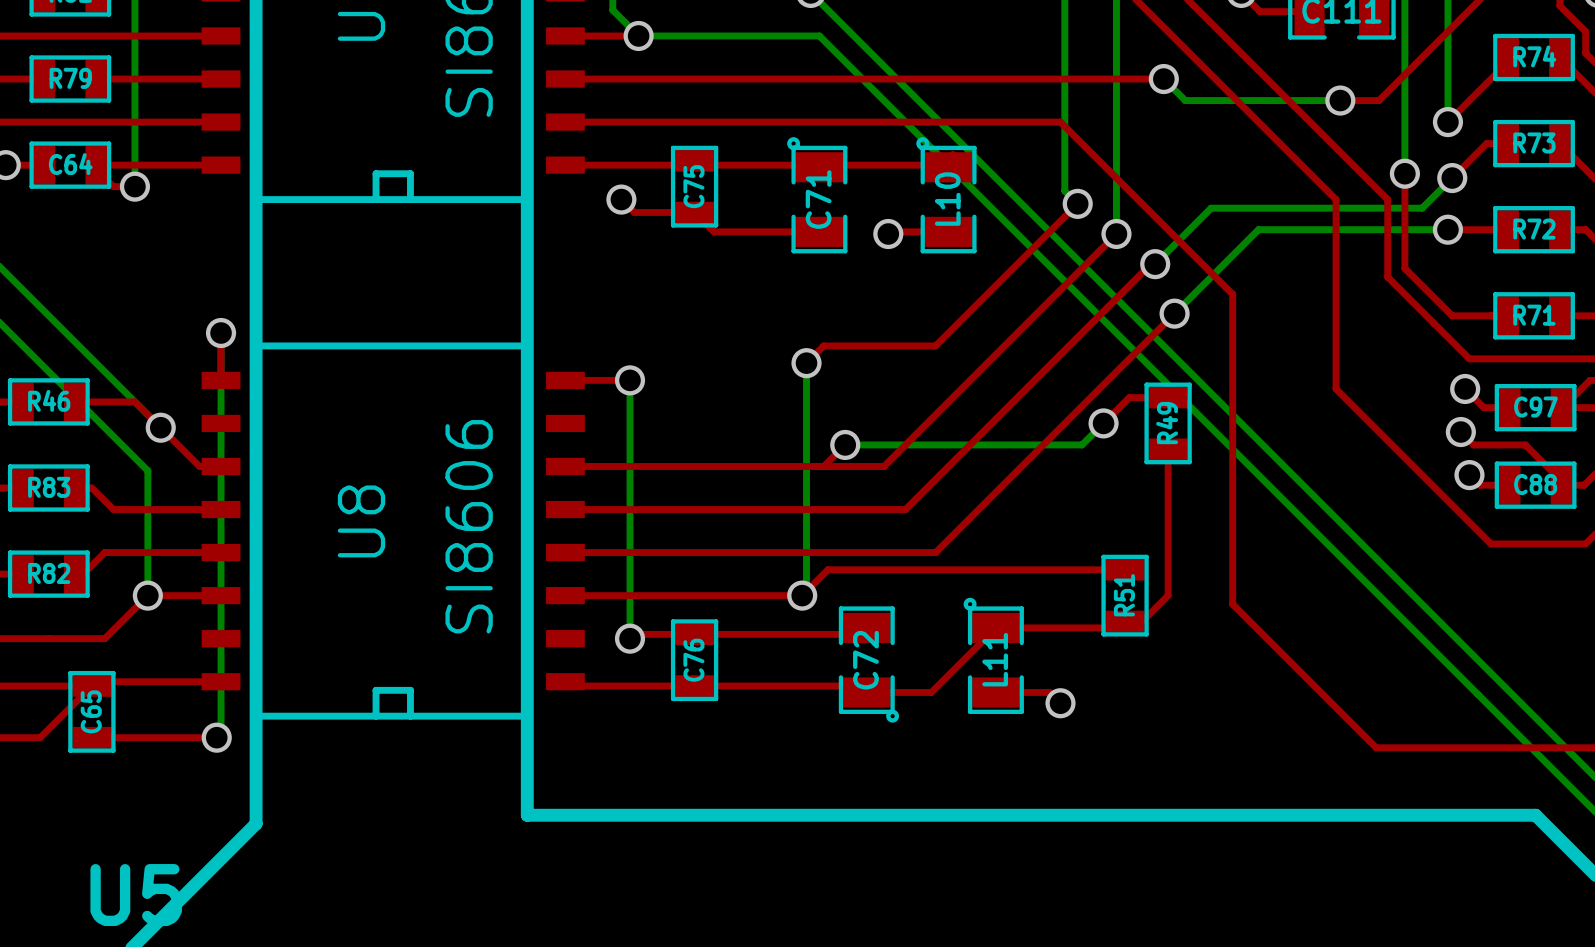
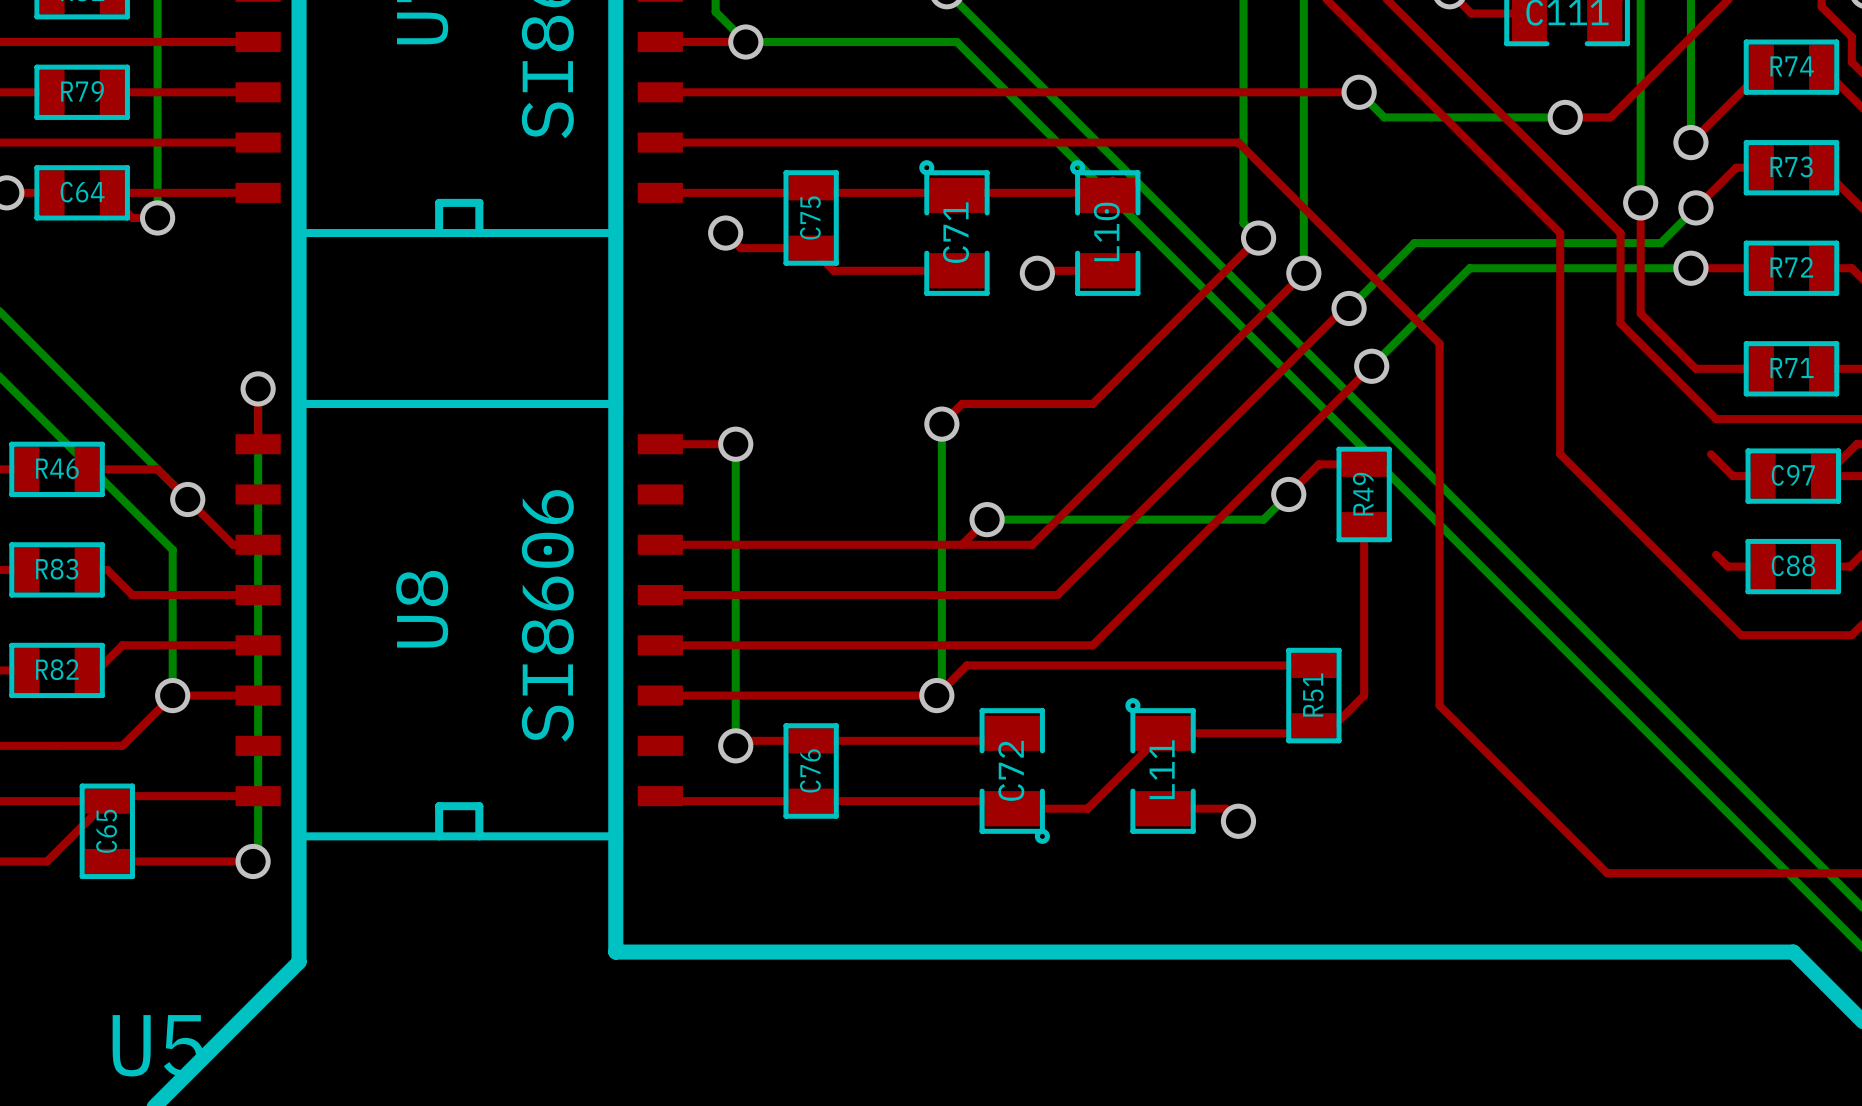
via: (1465, 388) -> none
top track: (1460, 432) (1473, 444) (1525, 444) (1561, 480) (1561, 485) -> none
via: (1460, 432) -> none
via: (1469, 475) -> none

